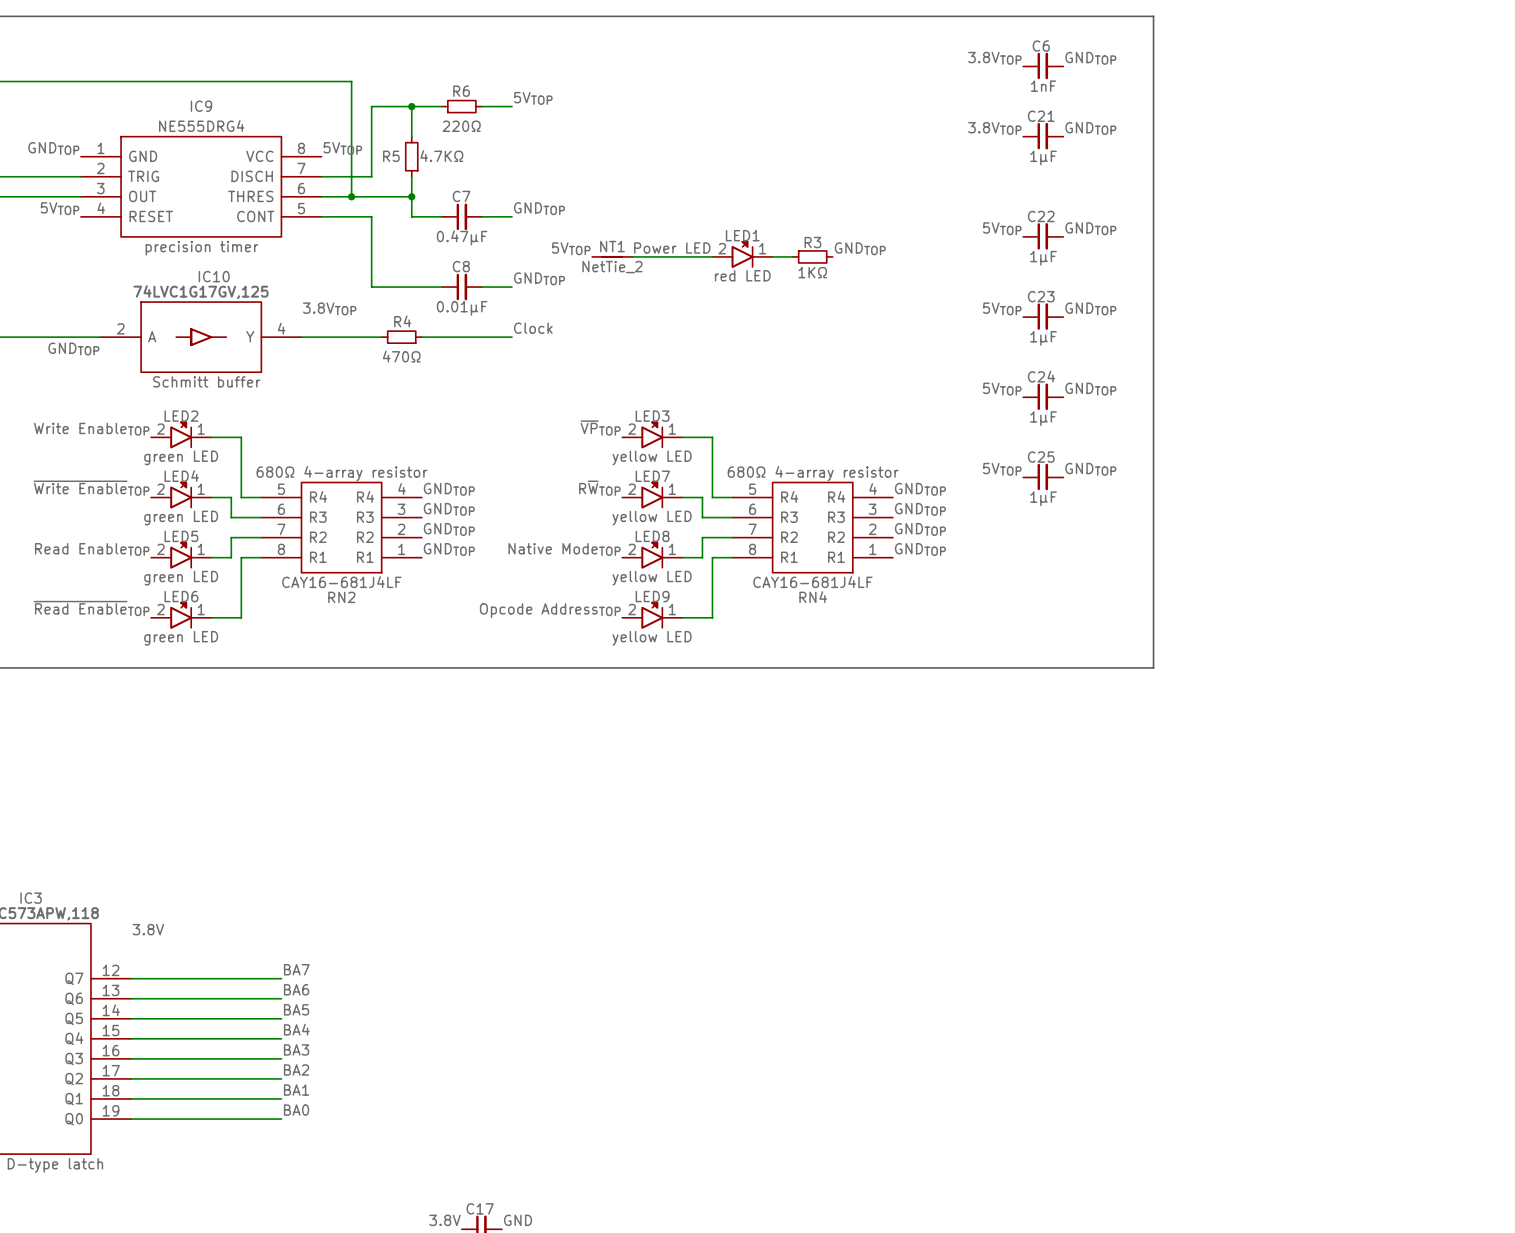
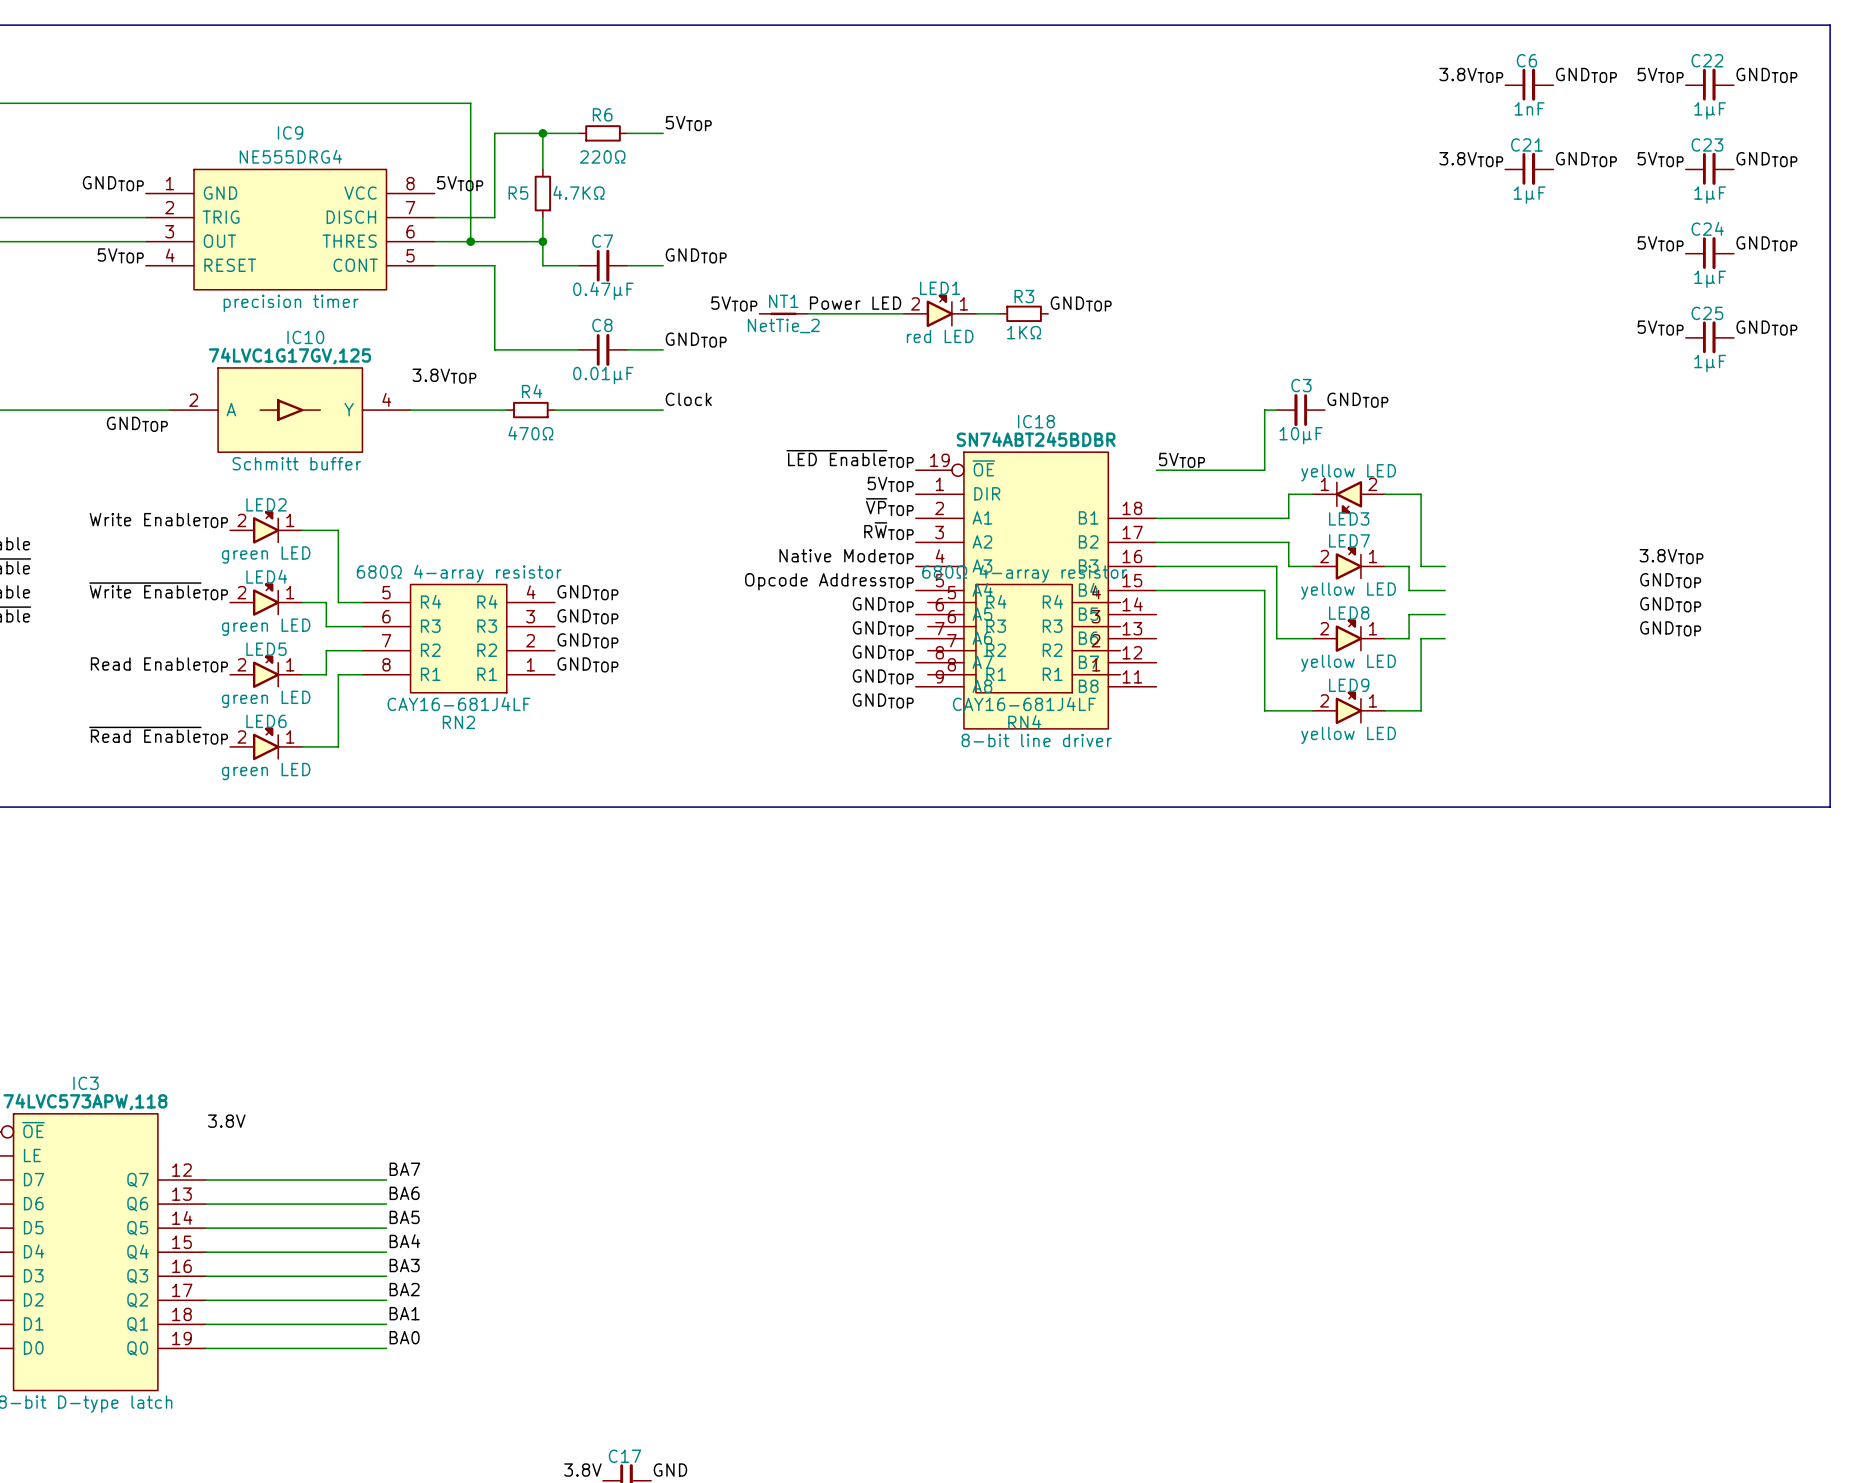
line: (1153, 16) (1153, 667) -> (1433, 25) (1830, 25) (1830, 807) (1433, 807)
label: 3.8VTOP (994, 58) -> none
label: GNDTOP (1090, 58) -> 3.8VTOP (1471, 75)
label: none -> GNDTOP (1586, 75)
label: none -> 5VTOP (1660, 75)
label: none -> GNDTOP (1766, 75)
C6 position: (1043, 65) -> (1529, 84)
label: 3.8VTOP (994, 128) -> none
label: GNDTOP (1090, 128) -> 3.8VTOP (1471, 159)
label: none -> GNDTOP (1586, 159)
label: none -> 5VTOP (1660, 159)
label: none -> GNDTOP (1766, 159)
C21 position: (1043, 136) -> (1529, 168)
label: none -> 5VTOP (1660, 243)
label: none -> GNDTOP (1766, 243)
label: 5VTOP (1002, 228) -> none
label: GNDTOP (1090, 228) -> none
C22 position: (1043, 236) -> (1709, 84)
label: none -> 5VTOP (1660, 328)
label: none -> GNDTOP (1766, 328)
label: 5VTOP (1002, 308) -> none
label position: GNDTOP (1090, 308) -> GNDTOP (1357, 400)
C23 position: (1043, 316) -> (1709, 168)
wire: none -> (1276, 410) (1264, 410) (1264, 470) (1156, 470)
C3: none -> (1300, 410)
label: none -> ~{LED Enable}TOP (850, 459)
label position: 5VTOP (1002, 389) -> 5VTOP (1182, 460)
label: GNDTOP (1090, 389) -> none
C24 position: (1043, 396) -> (1709, 253)
label: none -> 5VTOP (890, 484)
wire: none -> (1312, 494) (1288, 494) (1288, 518) (1156, 518)
wire: none -> (1384, 494) (1421, 494) (1421, 566) (1445, 566)
label position: ~{VP}TOP (600, 428) -> ~{VP}TOP (889, 507)
LED3 rotation: 0° (652, 434) -> 180° (1348, 497)
LED3 position: (652, 434) -> (1348, 497)
wire: (682, 437) (712, 437) (712, 497) (732, 497) -> none
wire: none -> (1156, 542) (1288, 542) (1288, 566) (1312, 566)
label: none -> 3.8VTOP (1671, 556)
wire: none -> (1156, 566) (1276, 566) (1276, 638) (1312, 638)
wire: none -> (1384, 566) (1409, 566) (1409, 590) (1445, 590)
label: 5VTOP (1002, 469) -> none
label: GNDTOP (1090, 469) -> none
C25 position: (1043, 476) -> (1709, 337)
label: none -> GNDTOP (1670, 580)
IC18: none -> SN74ABT245BDBR (1036, 590)
wire: none -> (1156, 590) (1264, 590) (1264, 710) (1312, 710)
label position: R~{W}TOP (599, 488) -> R~{W}TOP (888, 531)
label: GNDTOP (920, 489) -> none
LED7 position: (652, 495) -> (1348, 563)
wire: (682, 497) (702, 497) (702, 517) (732, 517) -> none
label: none -> GNDTOP (883, 604)
label: none -> GNDTOP (1670, 604)
wire: none -> (1445, 614) (1409, 614) (1409, 638) (1384, 638)
label: GNDTOP (920, 509) -> none
label: none -> GNDTOP (883, 628)
label: none -> GNDTOP (1670, 628)
wire: none -> (1445, 638) (1421, 638) (1421, 710) (1384, 710)
label: GNDTOP (920, 529) -> none
wire: (732, 537) (702, 537) (702, 557) (682, 557) -> none
label: none -> GNDTOP (883, 652)
label position: Native ModeTOP (564, 549) -> Native ModeTOP (846, 556)
label: GNDTOP (920, 549) -> none
LED8 position: (652, 555) -> (1348, 635)
wire: (732, 557) (712, 557) (712, 617) (682, 617) -> none
label: none -> GNDTOP (883, 676)
label: none -> GNDTOP (883, 700)
label position: Opcode AddressTOP (550, 610) -> Opcode AddressTOP (829, 581)
LED9 position: (652, 615) -> (1348, 707)

